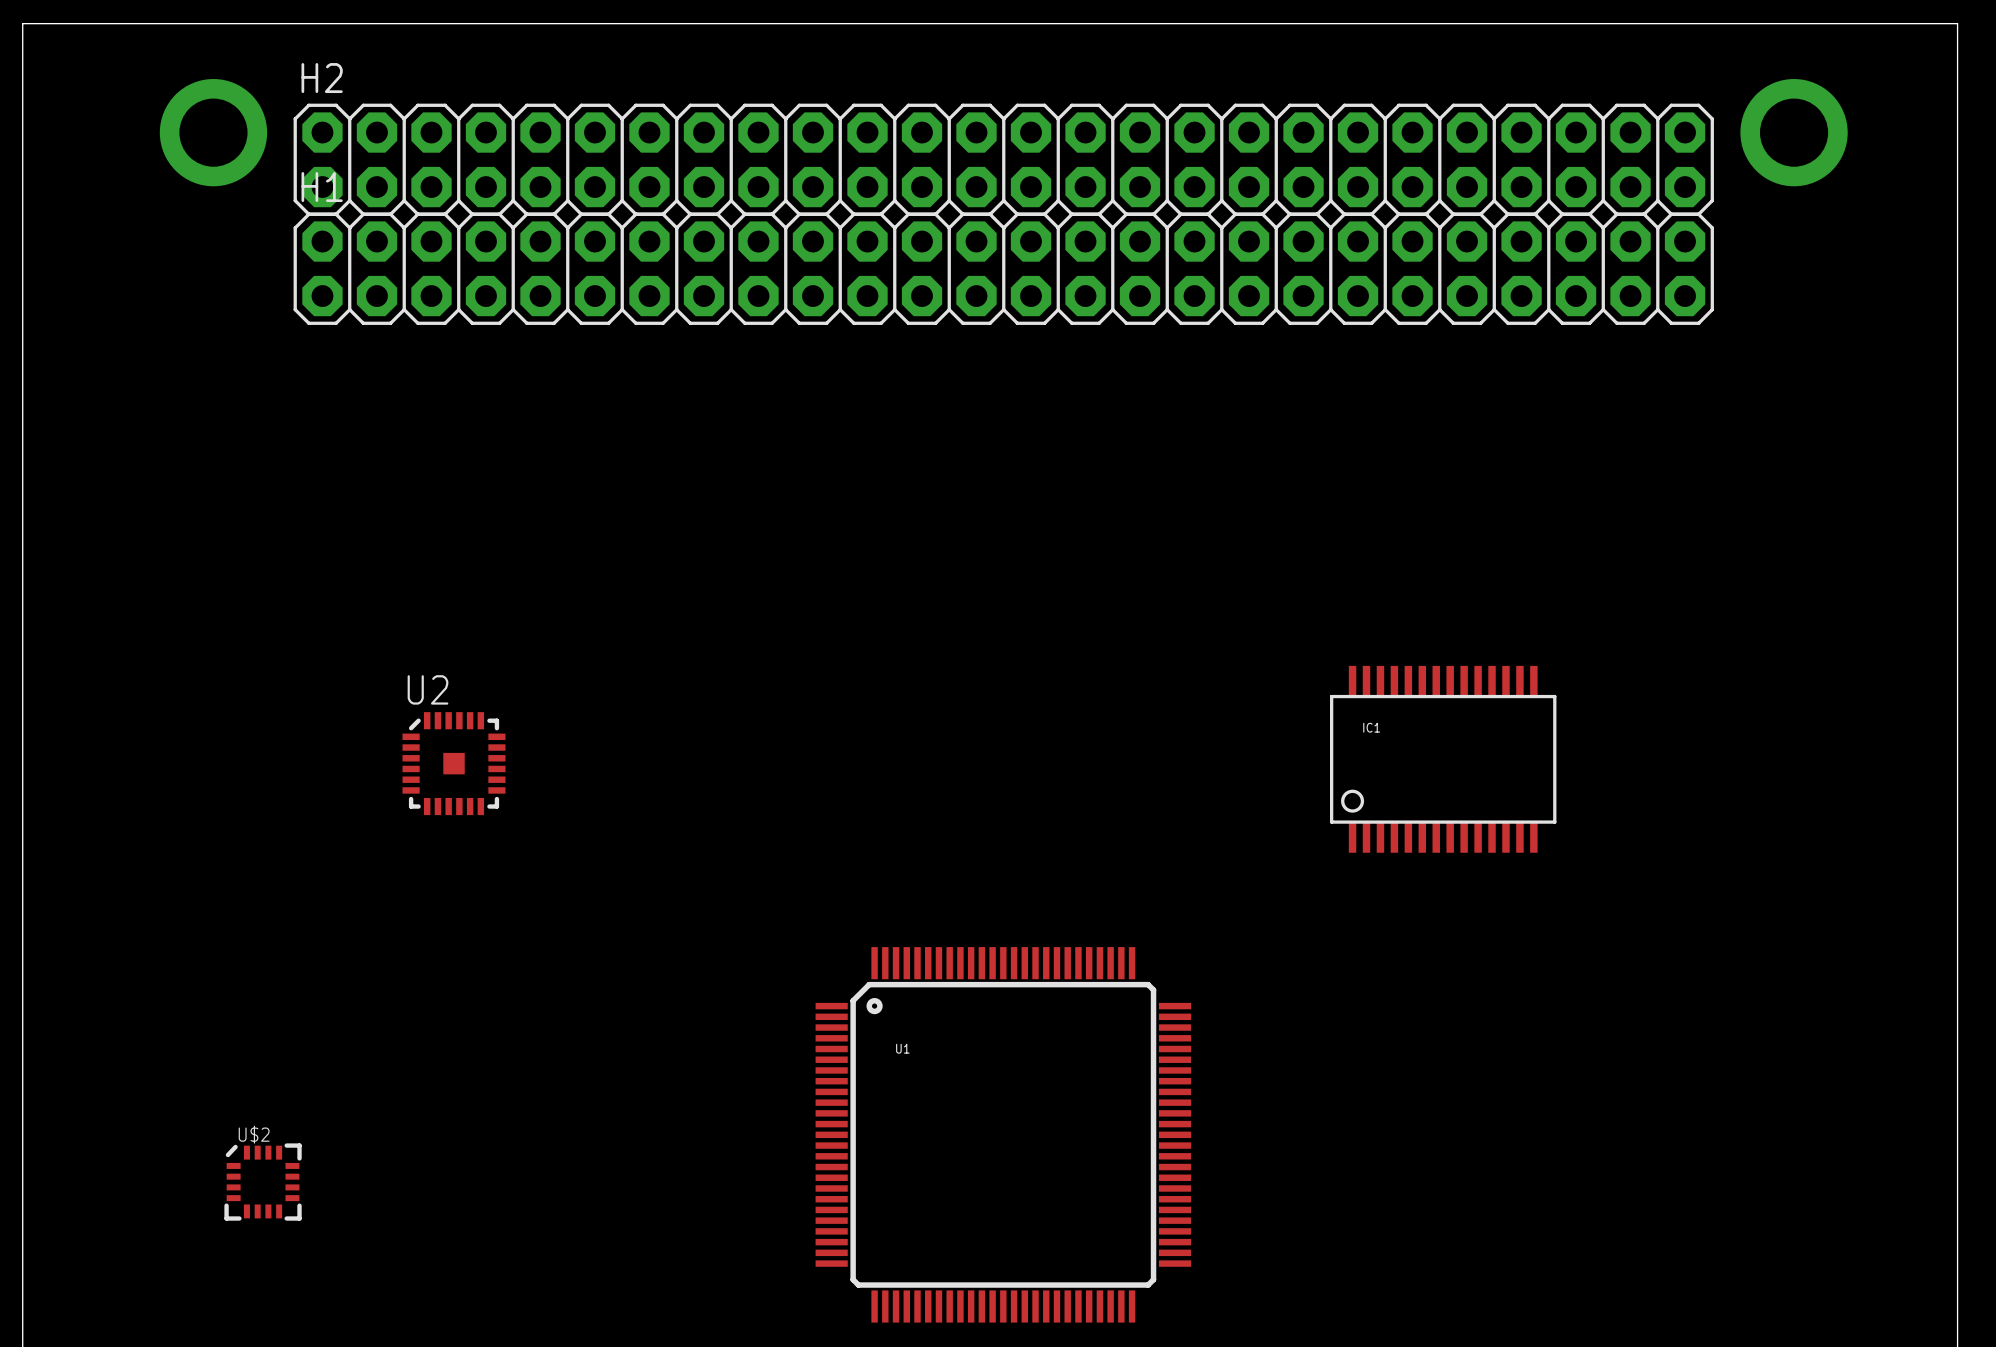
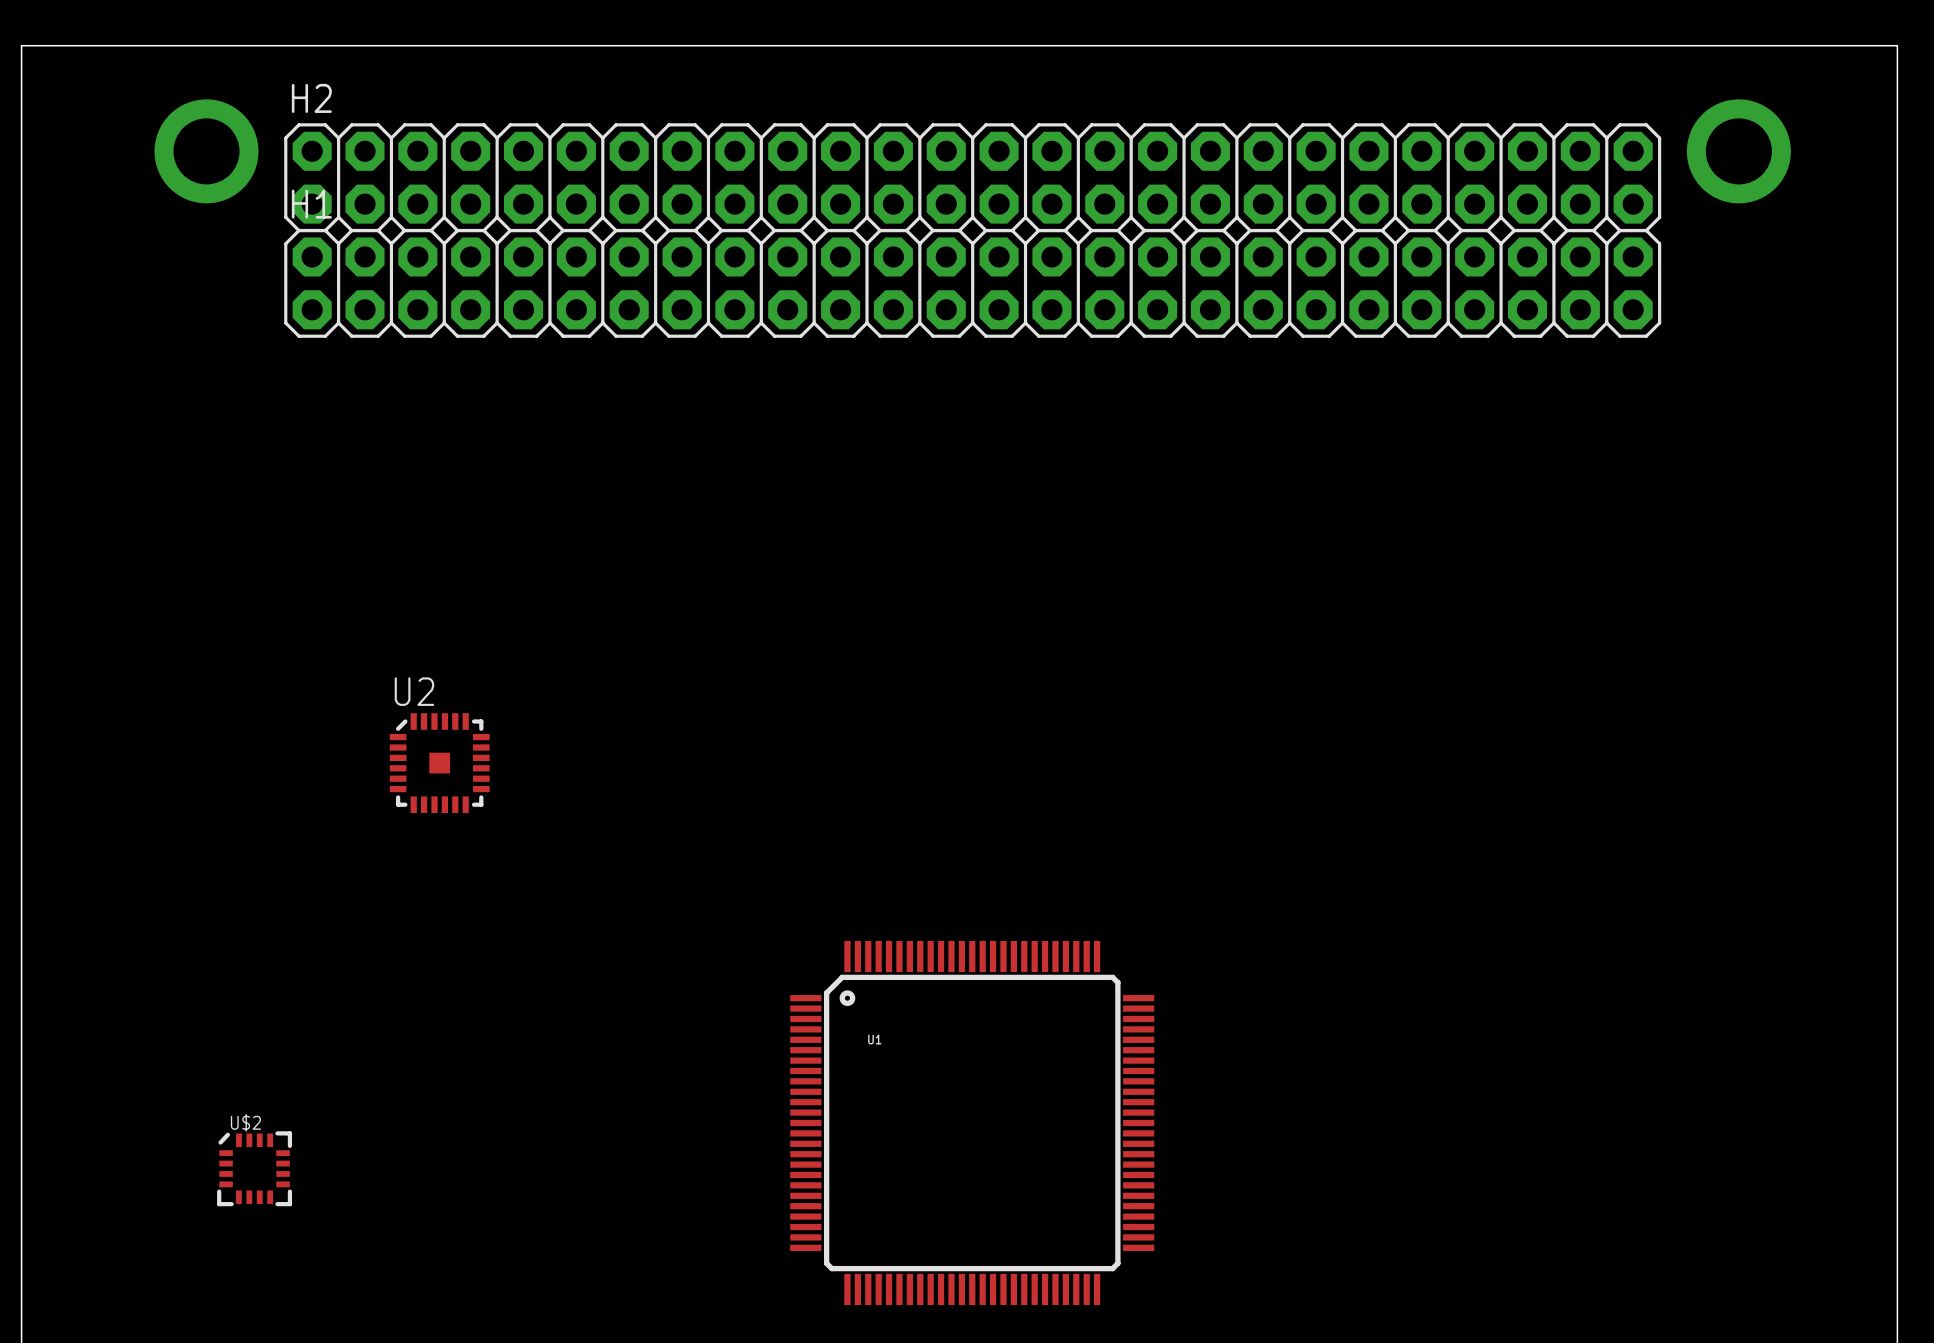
IC1: (1443, 759) -> none

